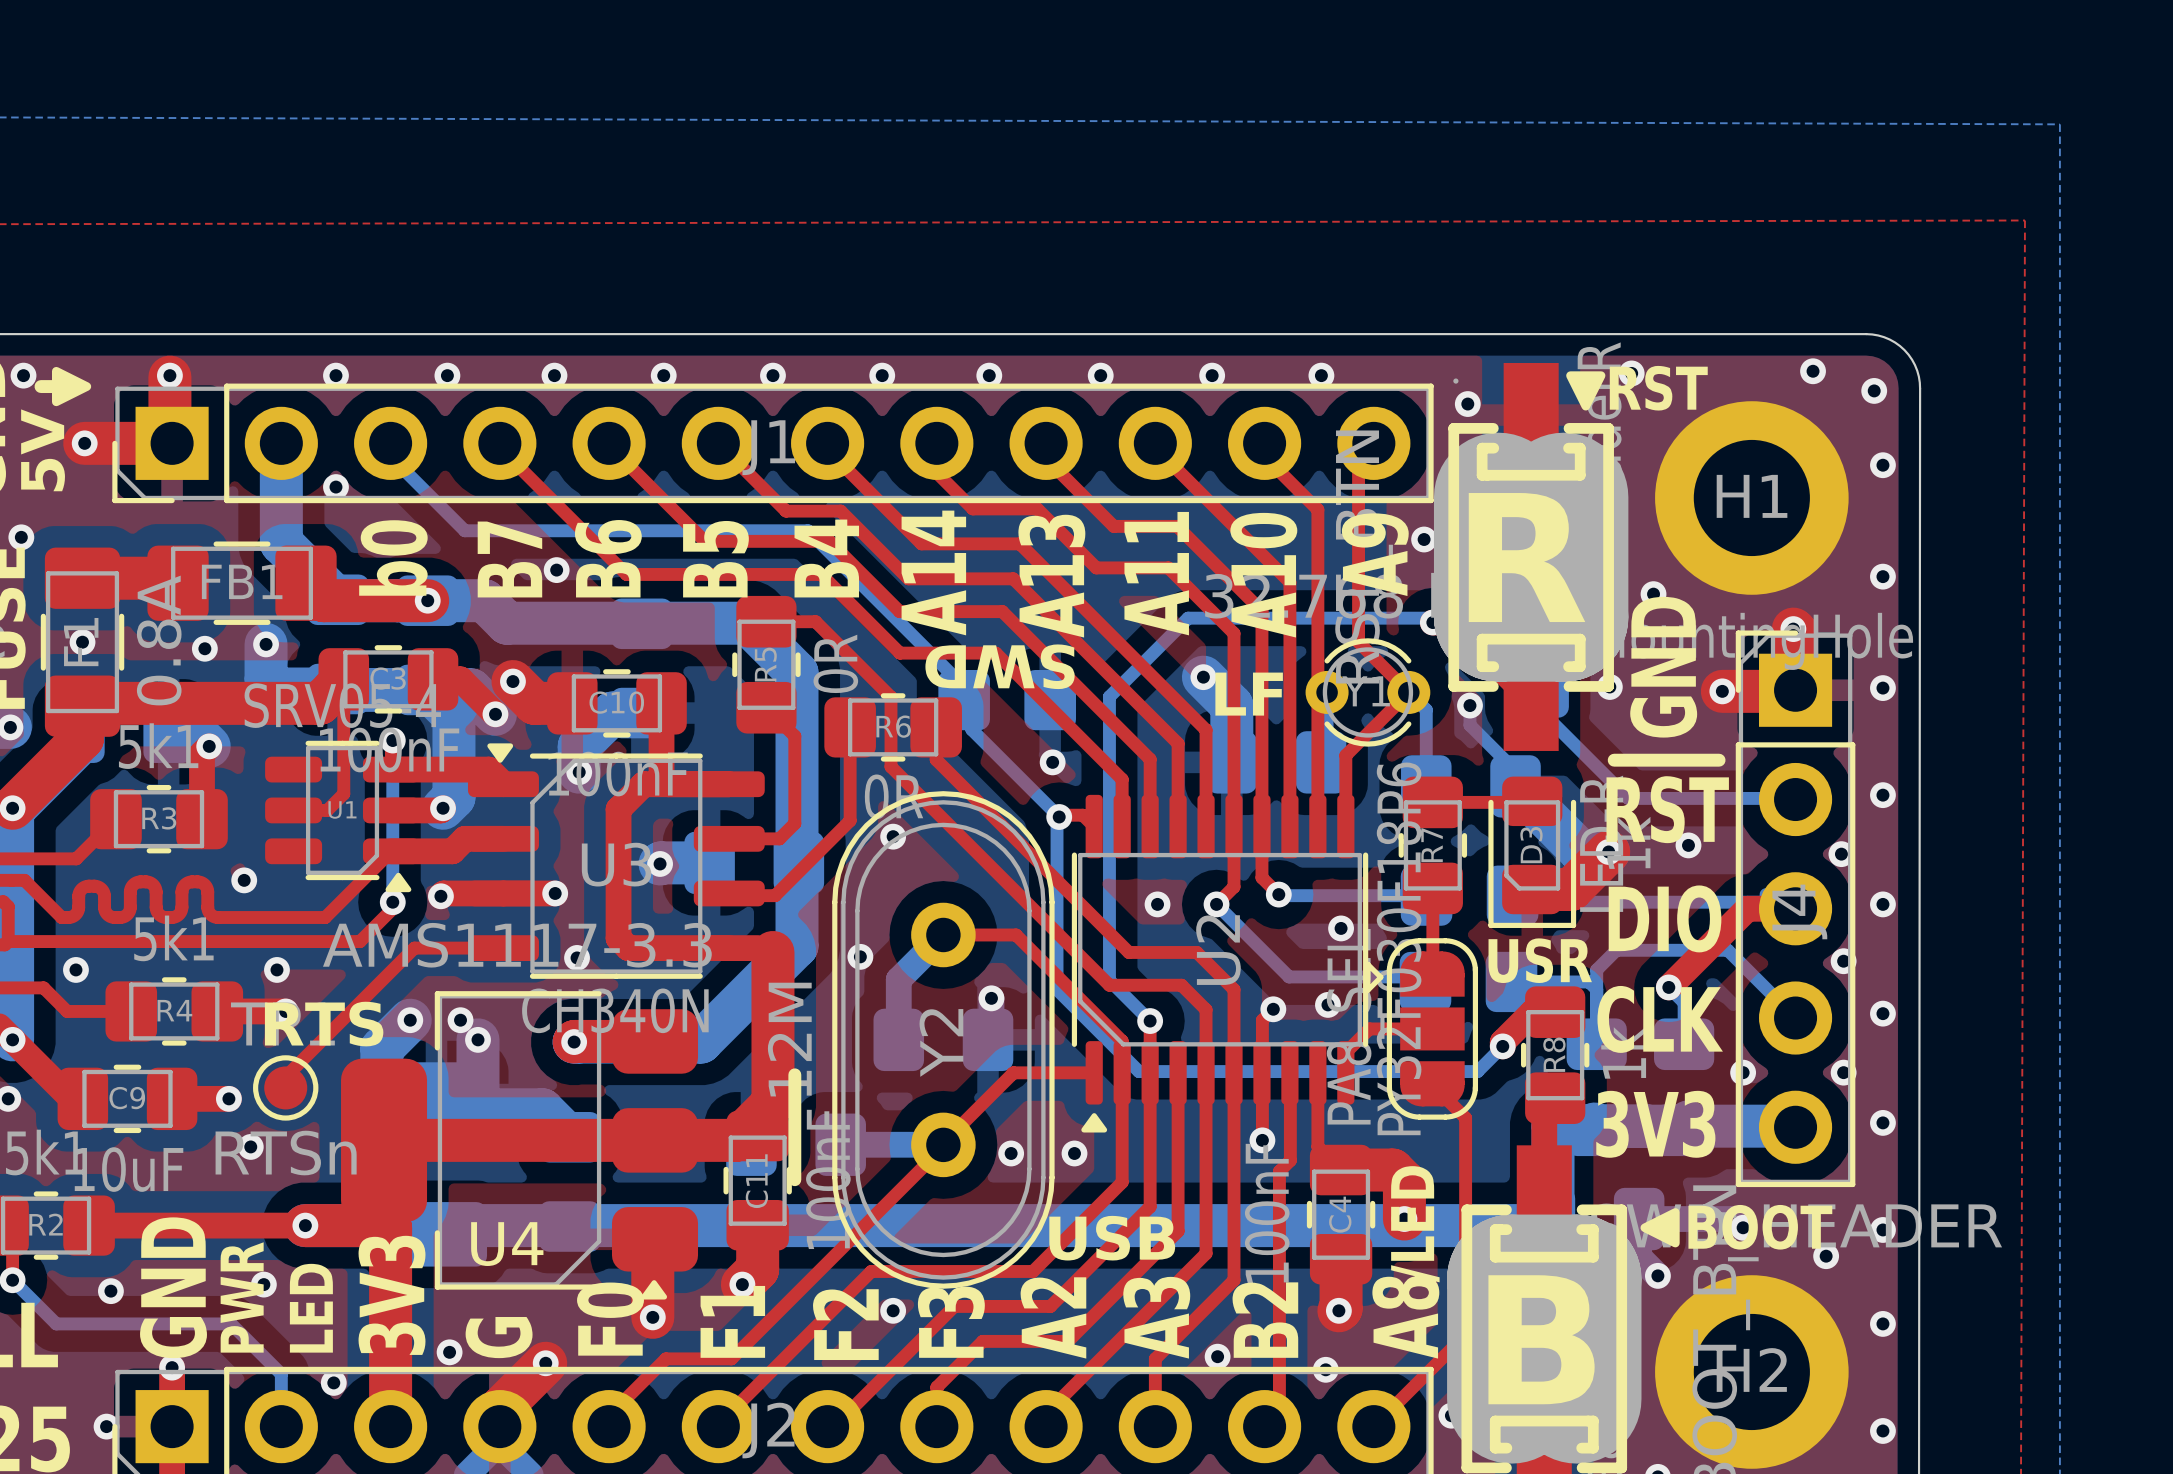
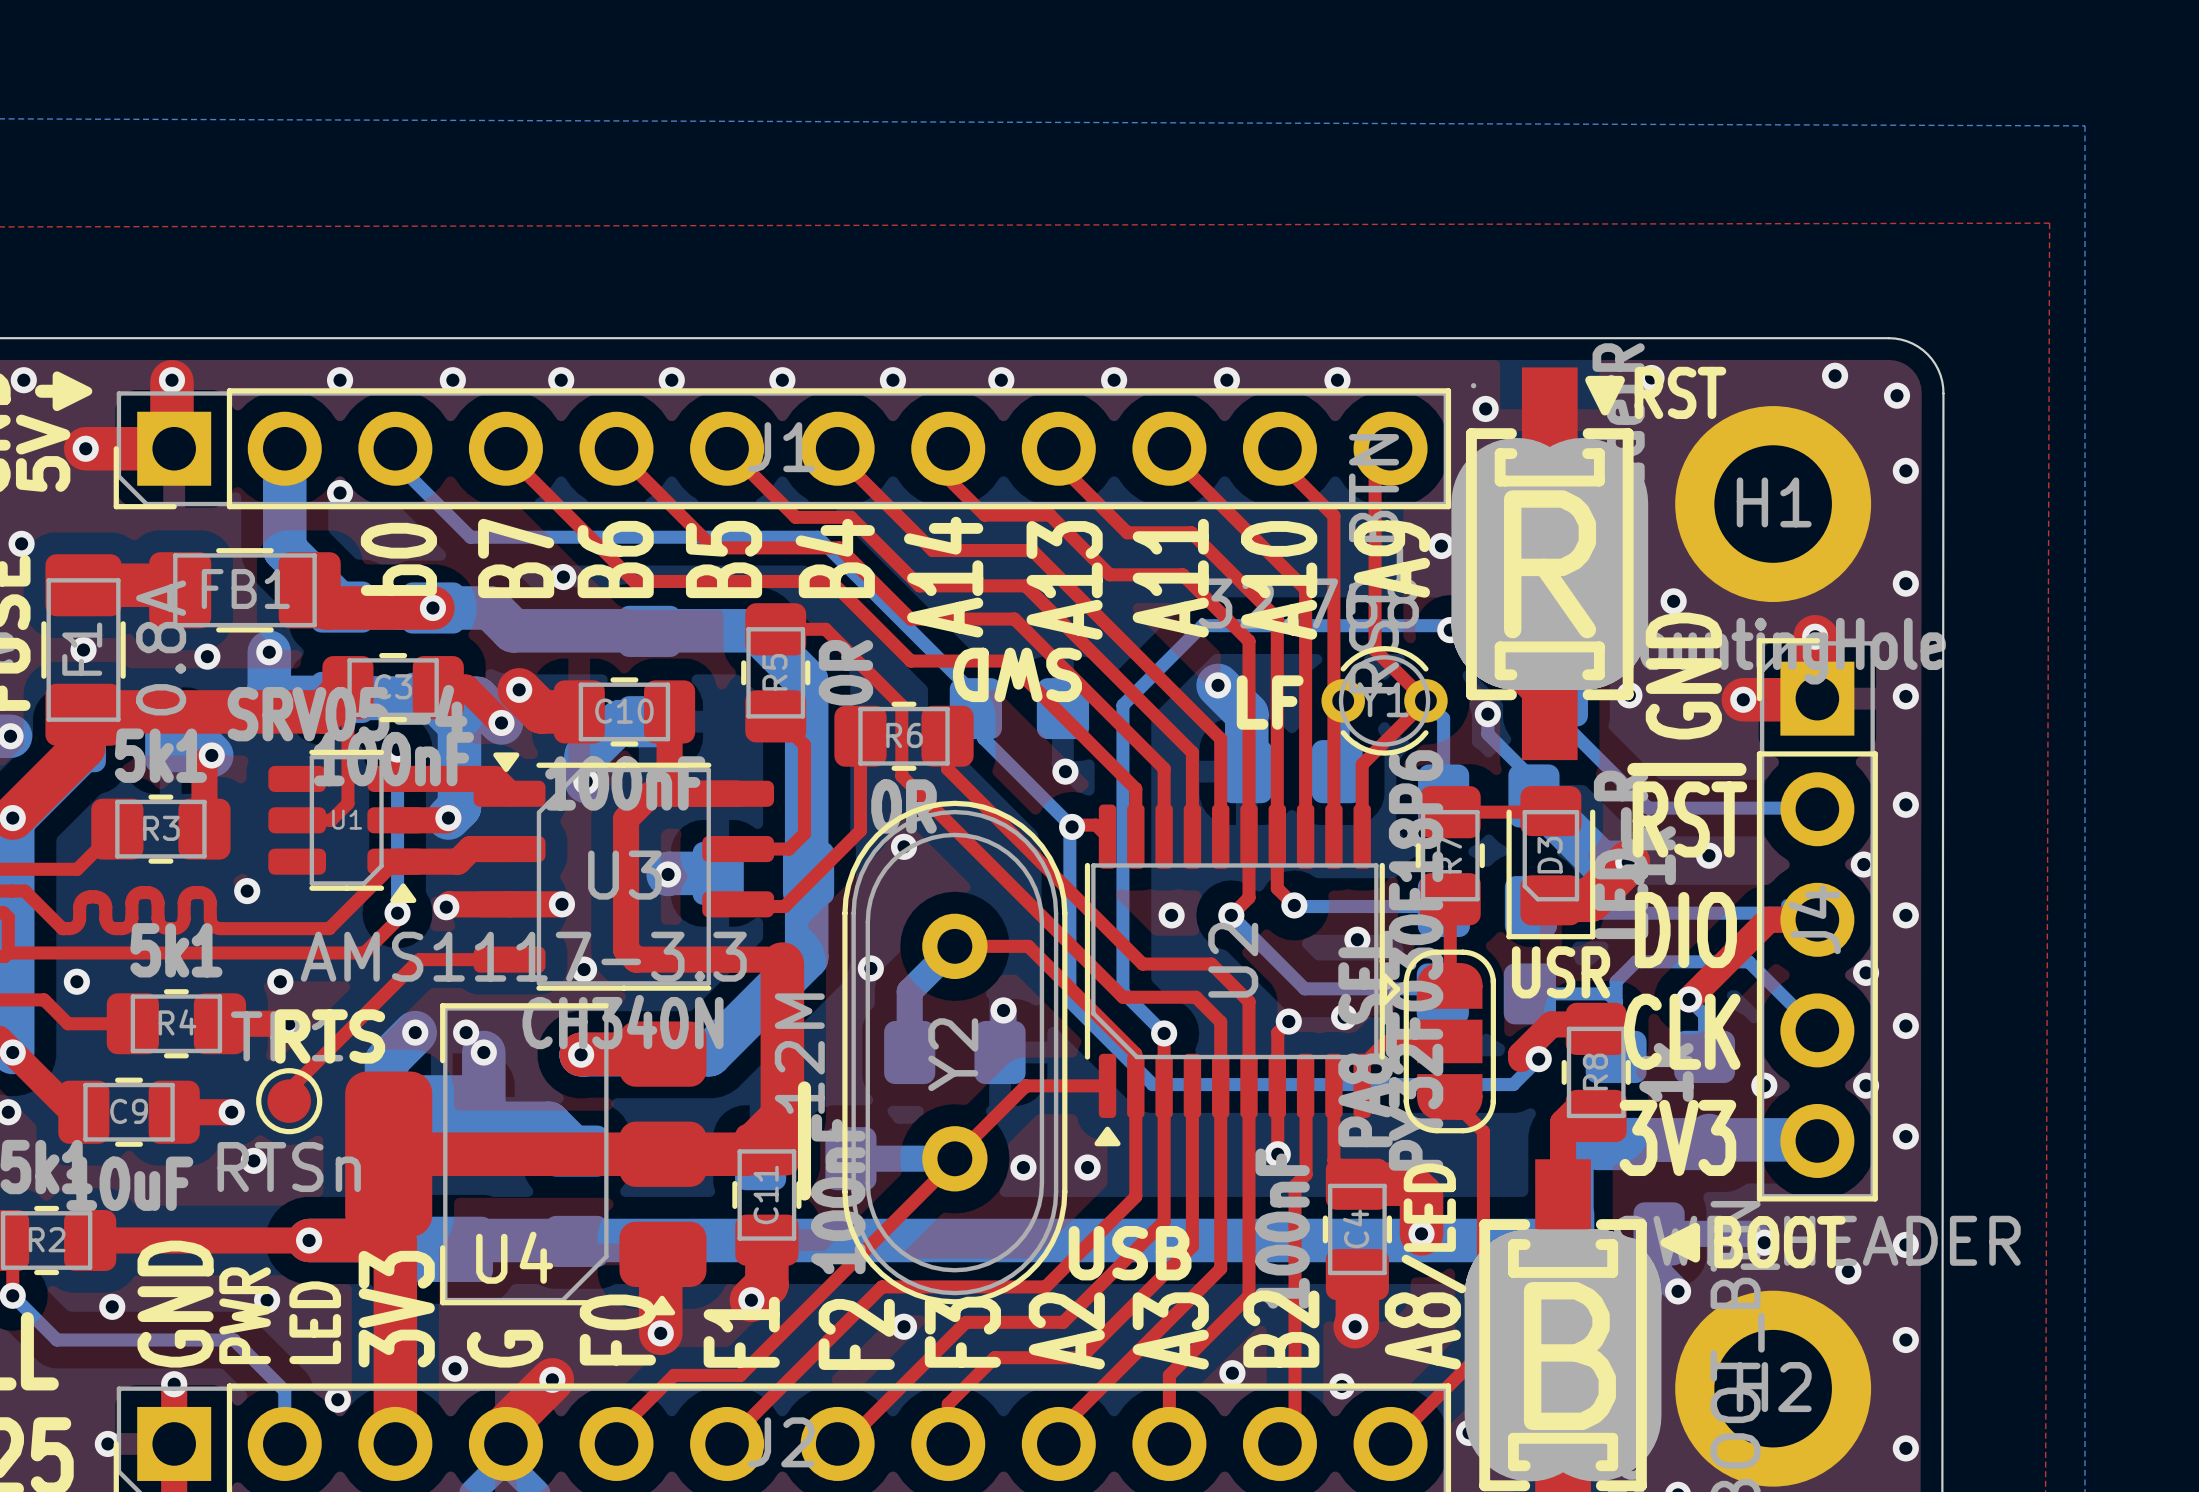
bottom track: (1502, 1046) (1477, 1071) -> (1538, 1059) (1513, 1084) (1495, 1084)
via position: (1502, 1046) -> (1538, 1059)
R8 position: (1555, 1055) -> (1596, 1072)

